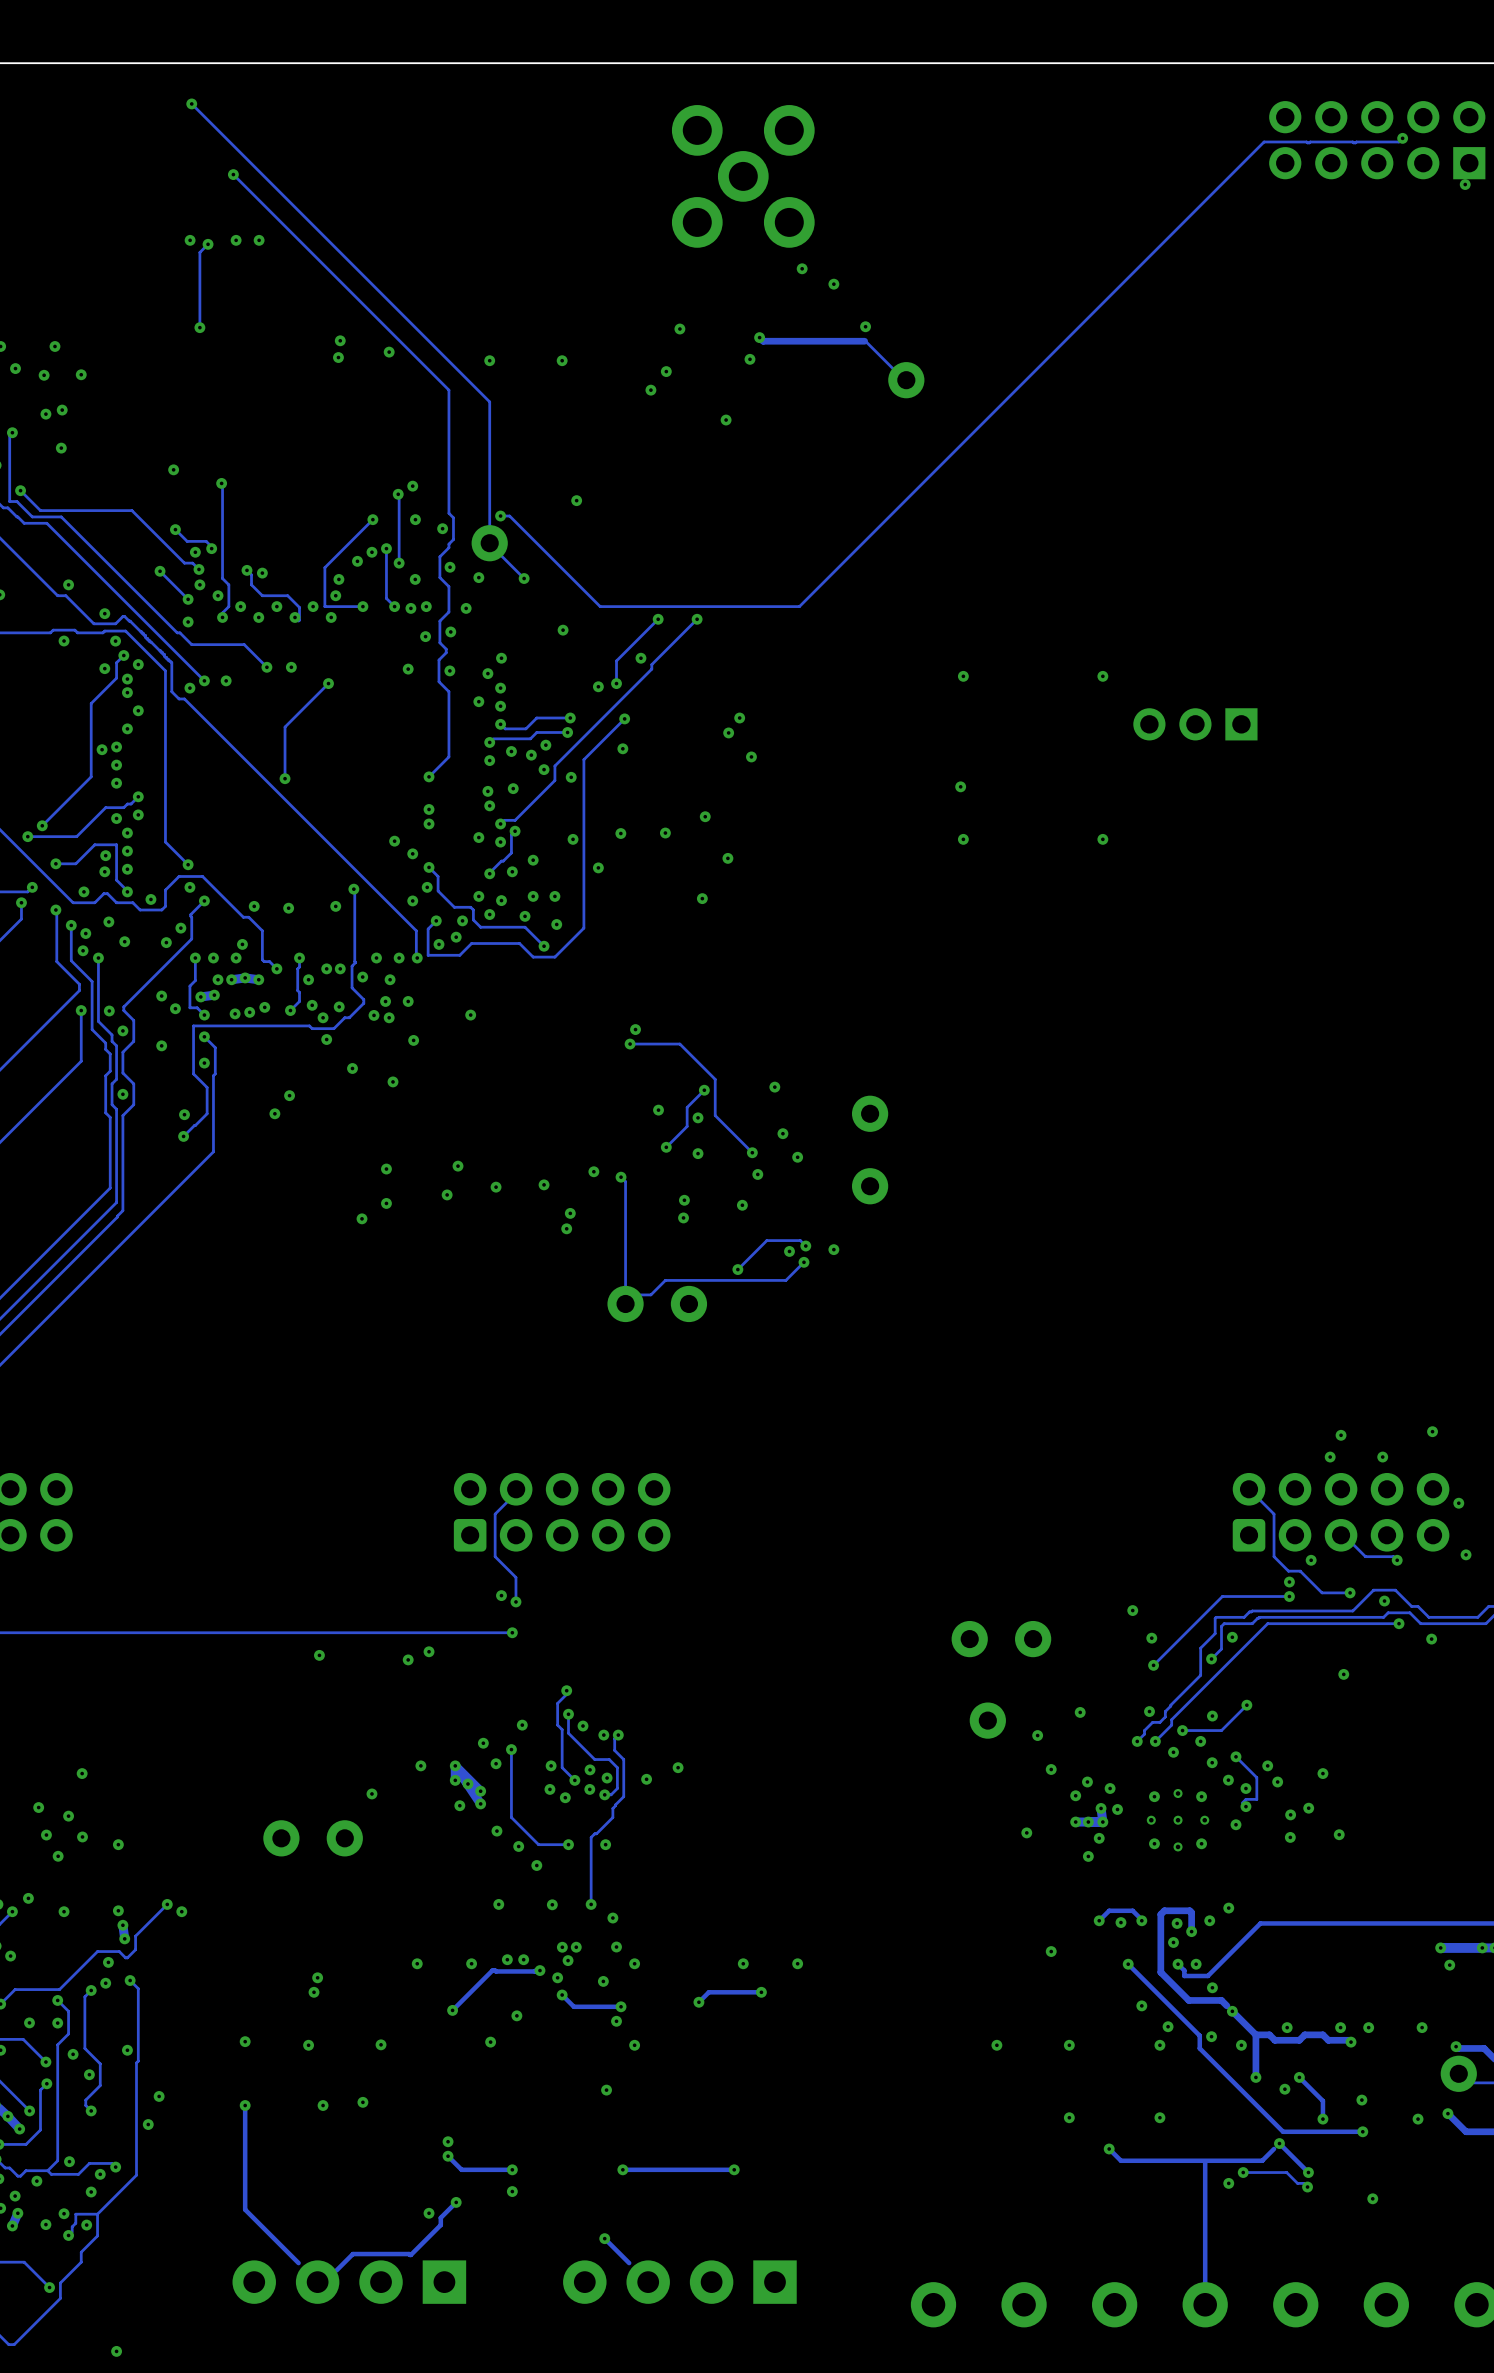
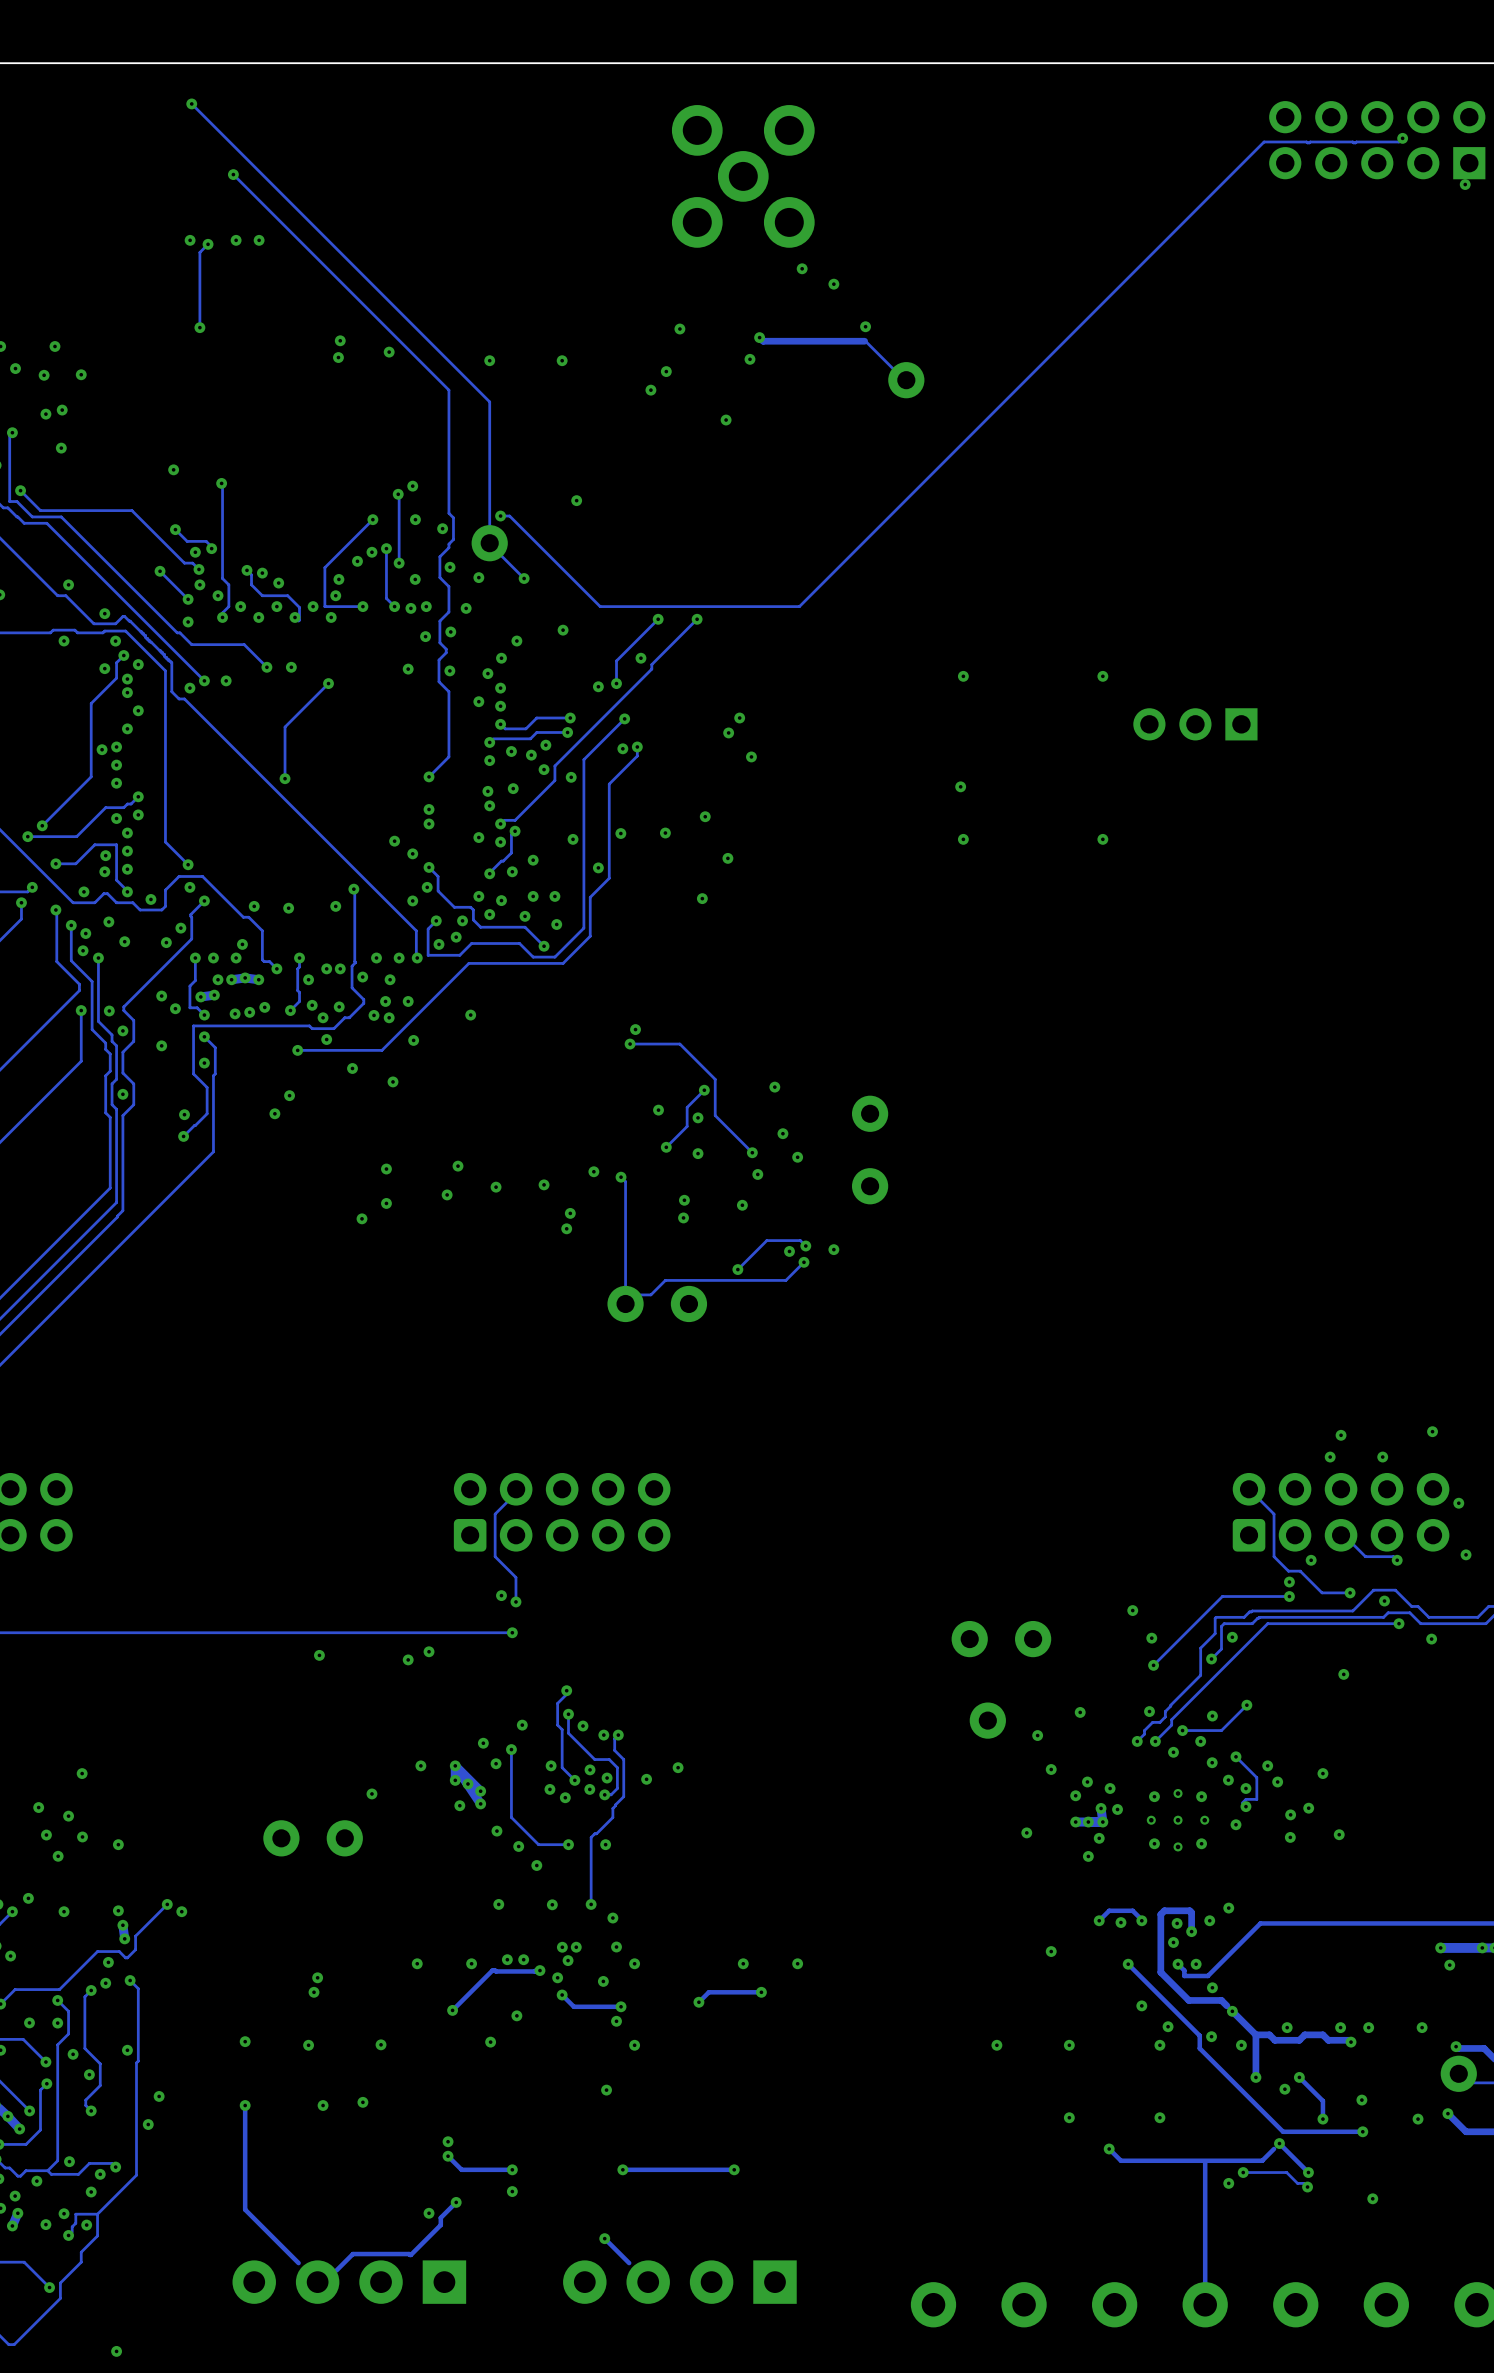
via: none -> (278, 583)
via: none -> (516, 641)
track: none -> (637, 746) (637, 756) (609, 784) (609, 878) (590, 897) (590, 936) (563, 963) (468, 963) (381, 1050) (297, 1050)
via: none -> (637, 746)
via: none -> (297, 1050)

